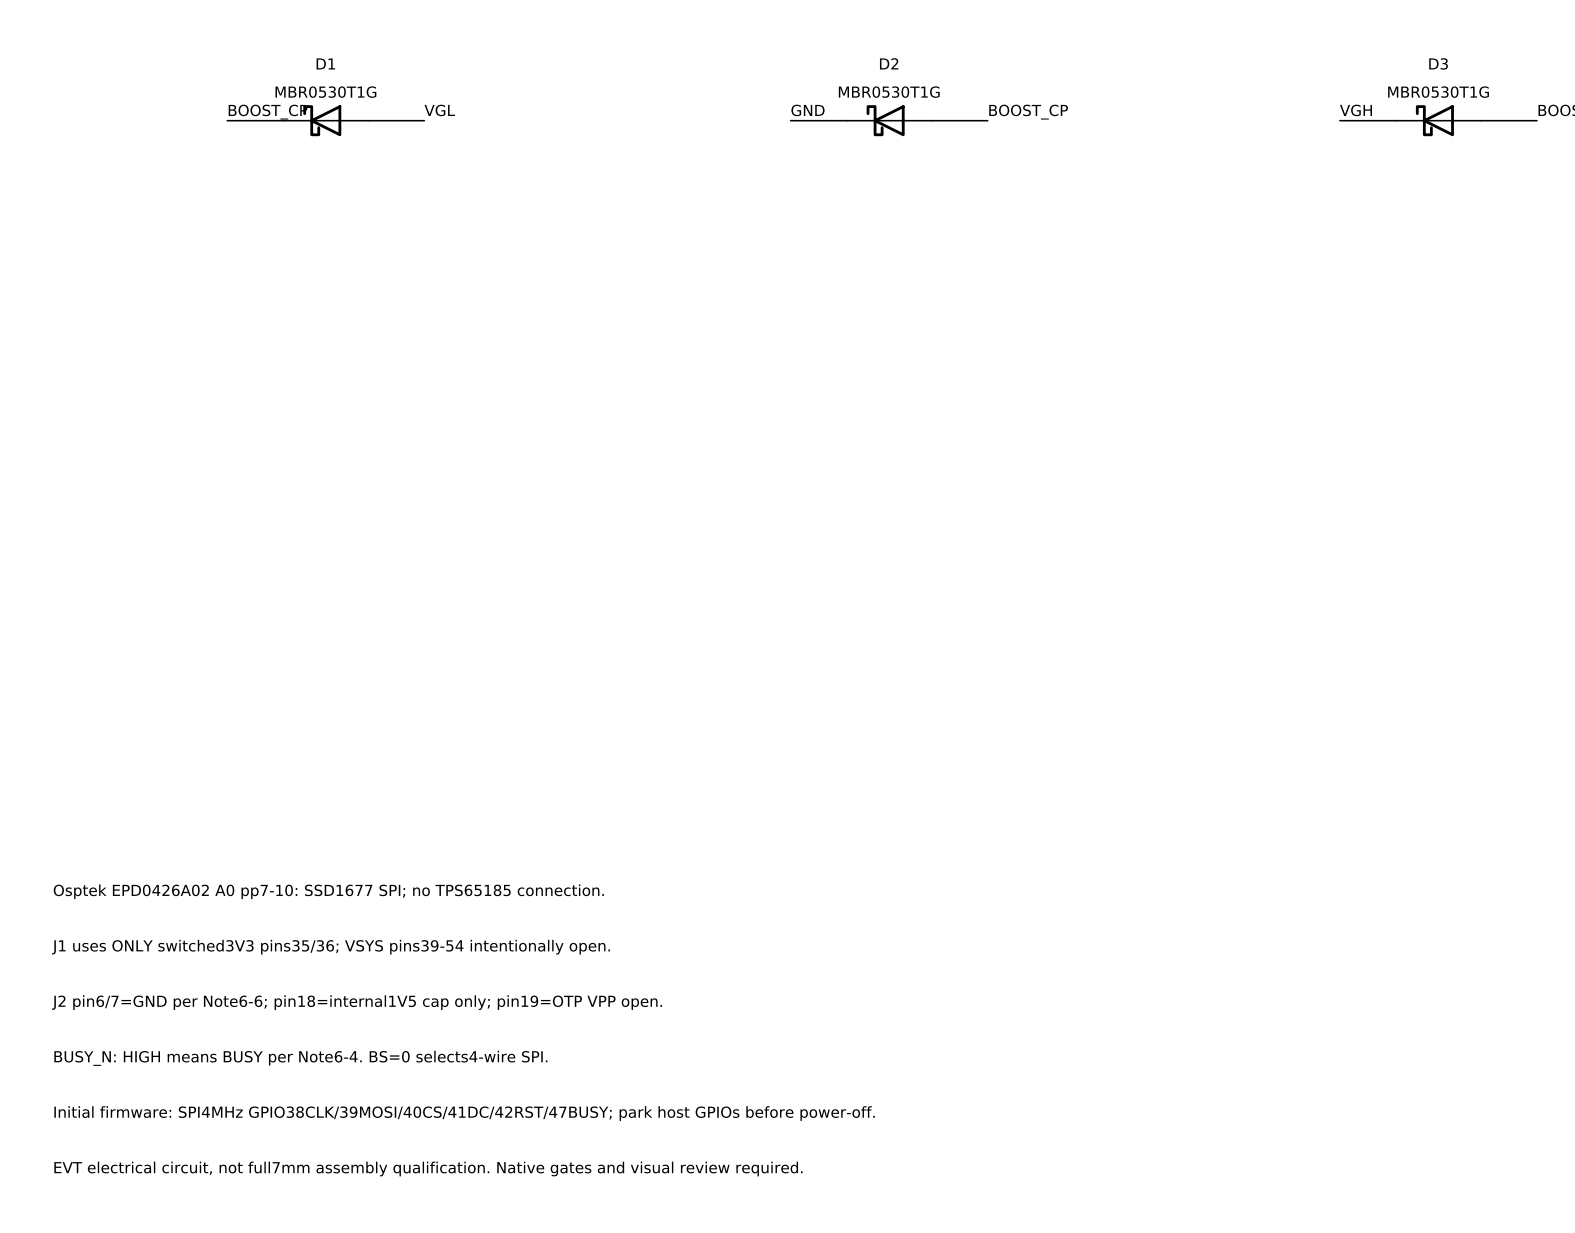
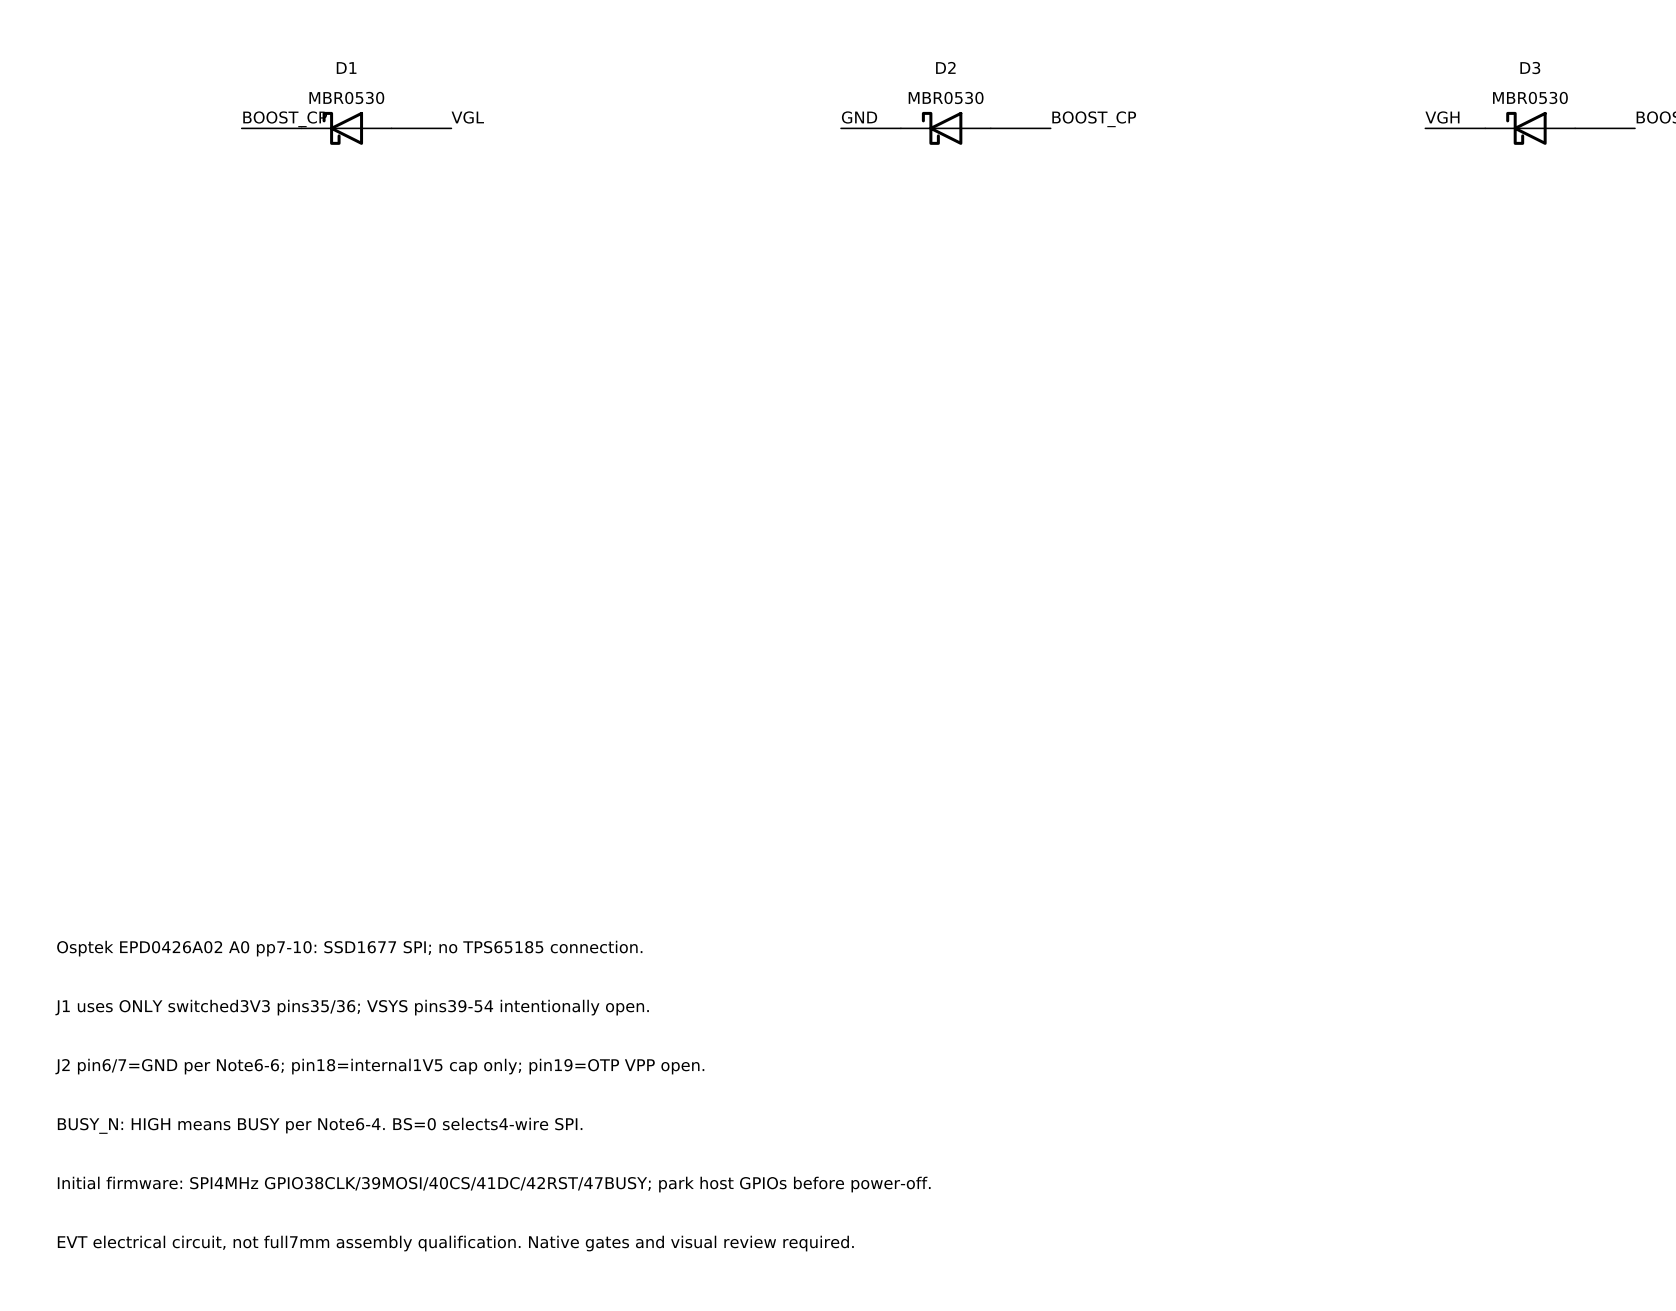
D1 value: MBR0530T1G (325, 92) -> MBR0530 (346, 97)
D2 value: MBR0530T1G (889, 92) -> MBR0530 (946, 97)
D3 value: MBR0530T1G (1438, 92) -> MBR0530 (1530, 97)

